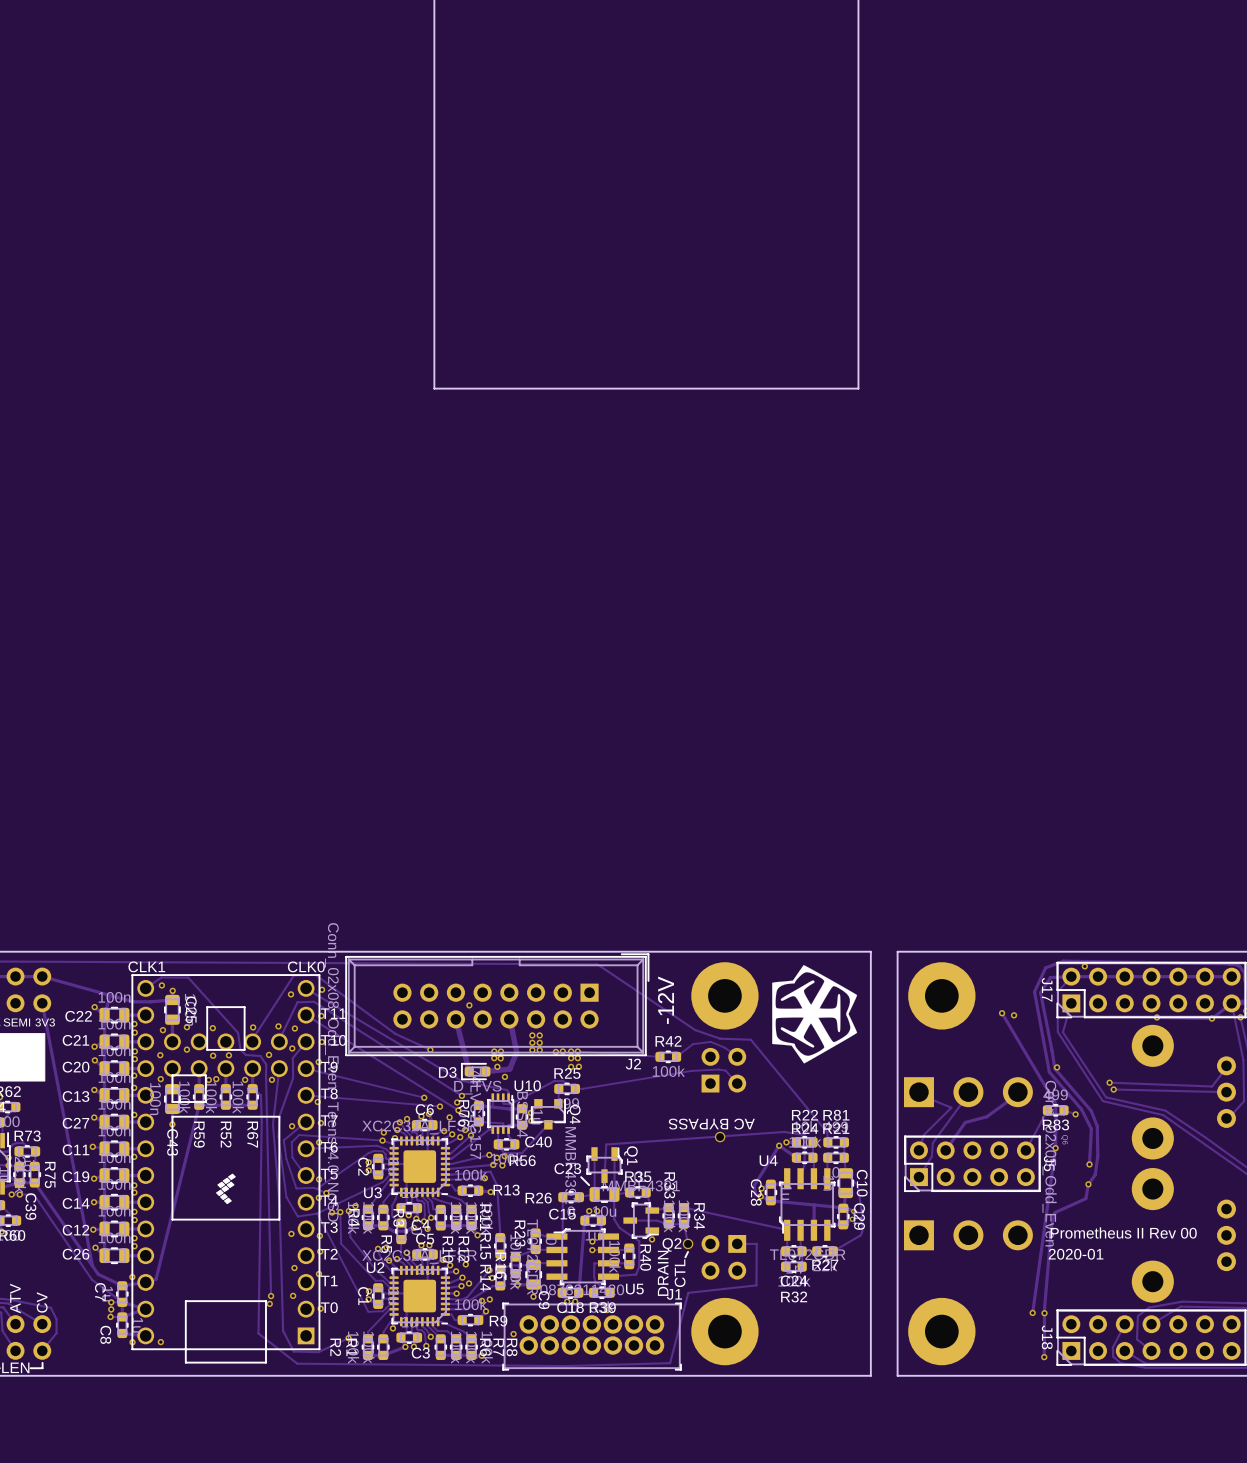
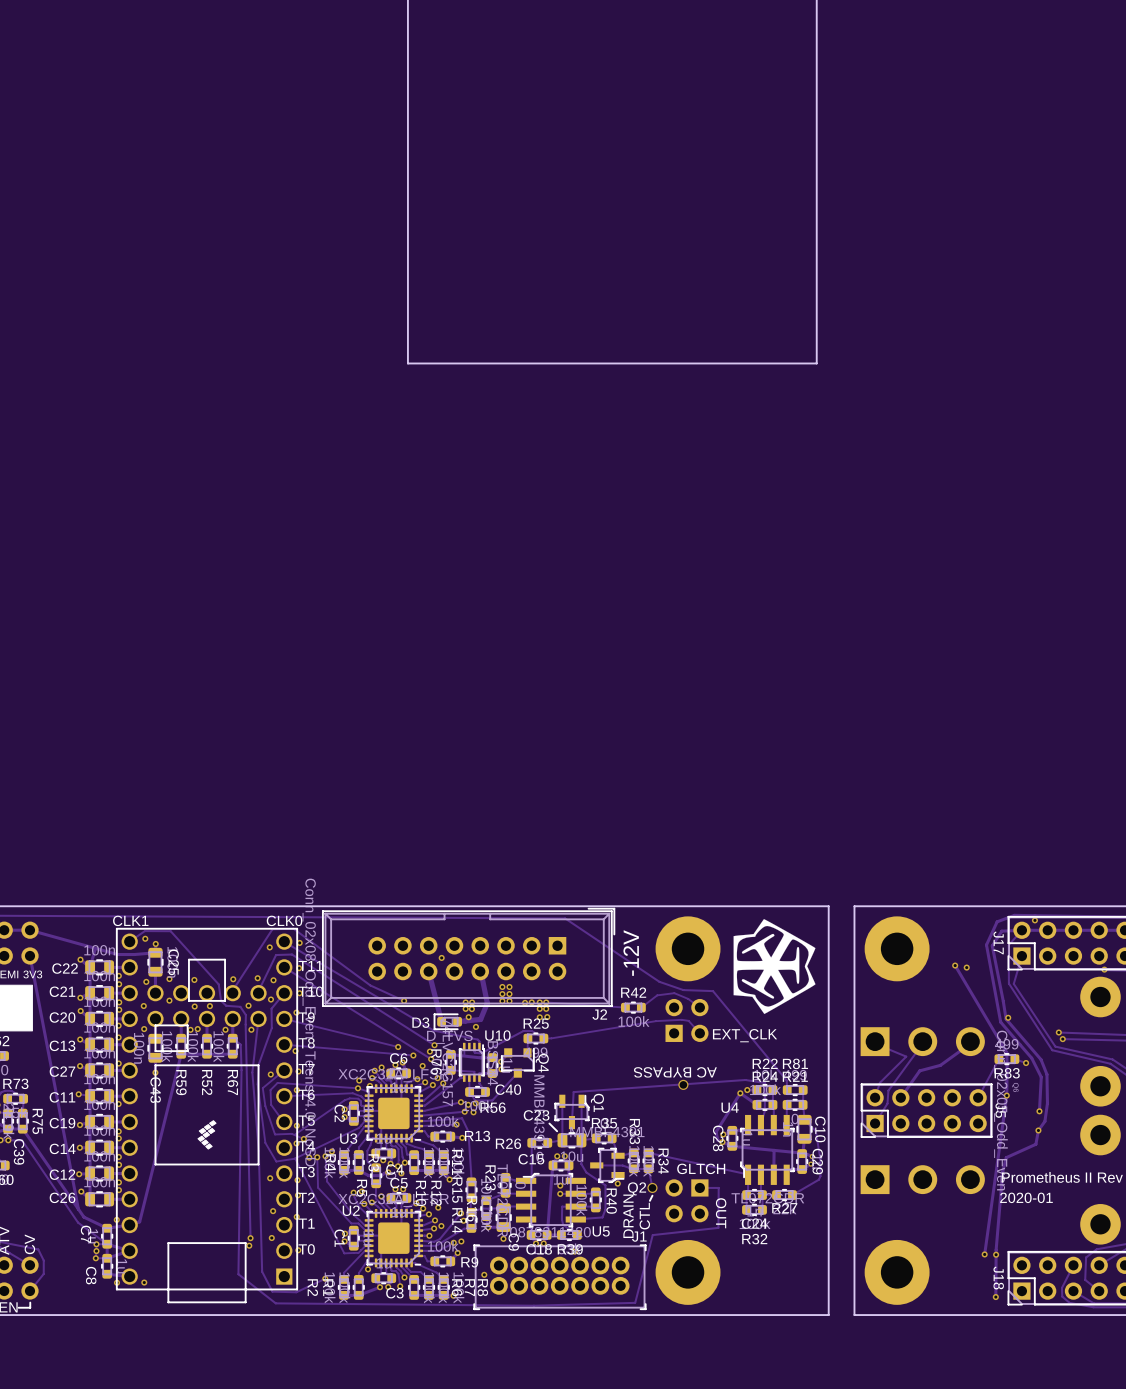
text: none -> EXT_CLK (745, 1035)
text: none -> GLTCH (701, 1168)
text: none -> OUT (721, 1213)

